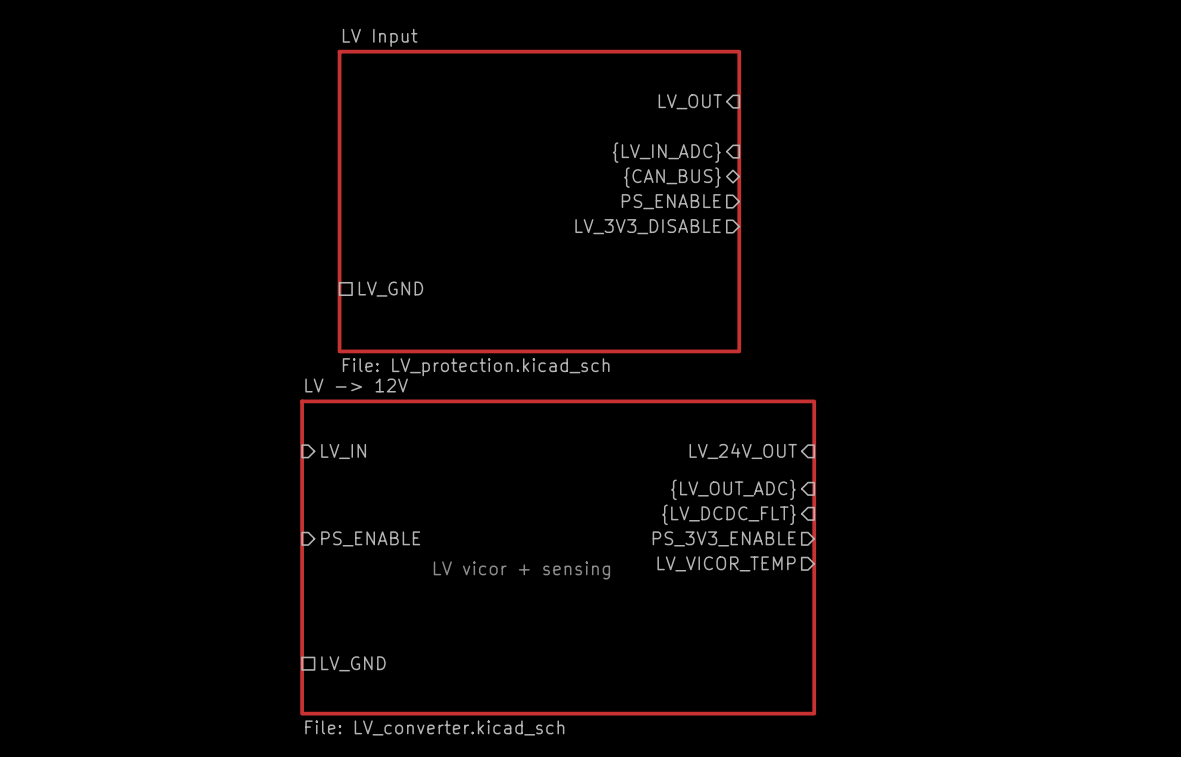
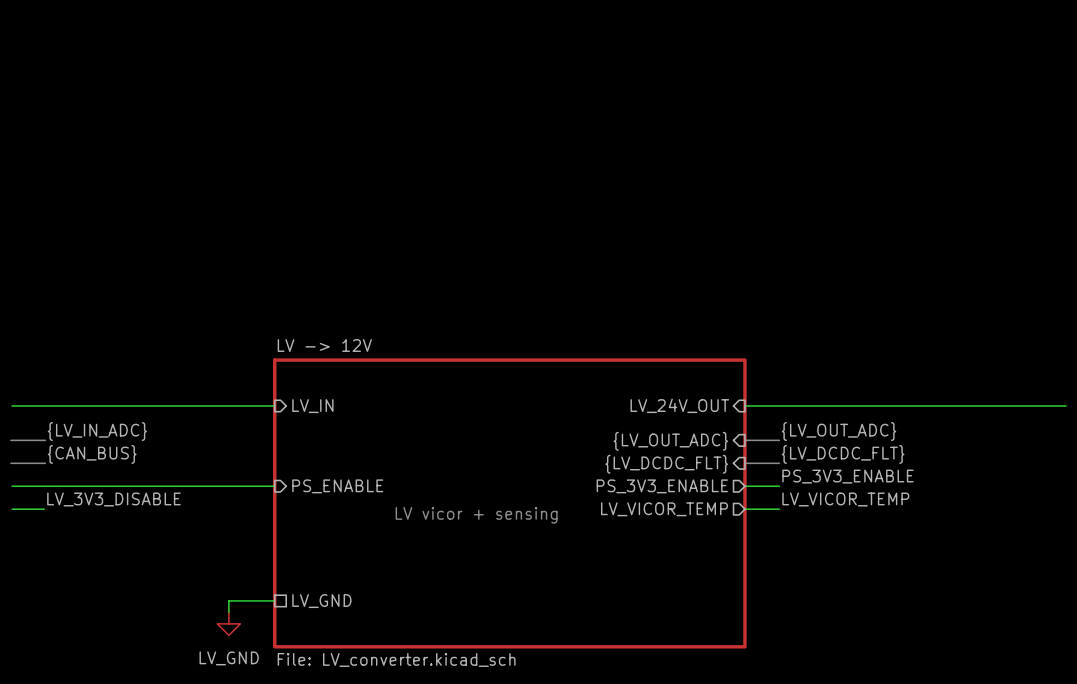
sheet pin: LV_OUT (690, 101) -> none
sheet pin: {LV_IN_ADC} (666, 152) -> none
sheet pin: {CAN_BUS} (672, 177) -> none
sheet LV Input: File: LV_protection.kicad_sch (539, 201) -> none
sheet pin: PS_ENABLE (671, 201) -> none
sheet pin: LV_3V3_DISABLE (648, 226) -> none
sheet pin: LV_GND (390, 289) -> none
wire: none -> (12, 405) (274, 405)
wire: none -> (744, 405) (1066, 405)
label: none -> {LV_IN_ADC} (97, 431)
label: none -> {LV_OUT_ADC} (838, 431)
bus: none -> (10, 440) (45, 440)
bus: none -> (744, 440) (779, 440)
label: none -> {CAN_BUS} (92, 454)
label: none -> {LV_DCDC_FLT} (843, 454)
bus: none -> (10, 463) (45, 463)
bus: none -> (744, 463) (779, 463)
label: none -> PS_3V3_ENABLE (848, 476)
wire: none -> (12, 486) (274, 486)
wire: none -> (744, 486) (779, 486)
label: none -> LV_3V3_DISABLE (113, 499)
label: none -> LV_VICOR_TEMP (845, 499)
wire: none -> (12, 509) (44, 509)
wire: none -> (744, 509) (779, 509)
wire: none -> (274, 600) (228, 600) (228, 612)
power symbol: none -> LV_GND (228, 623)

